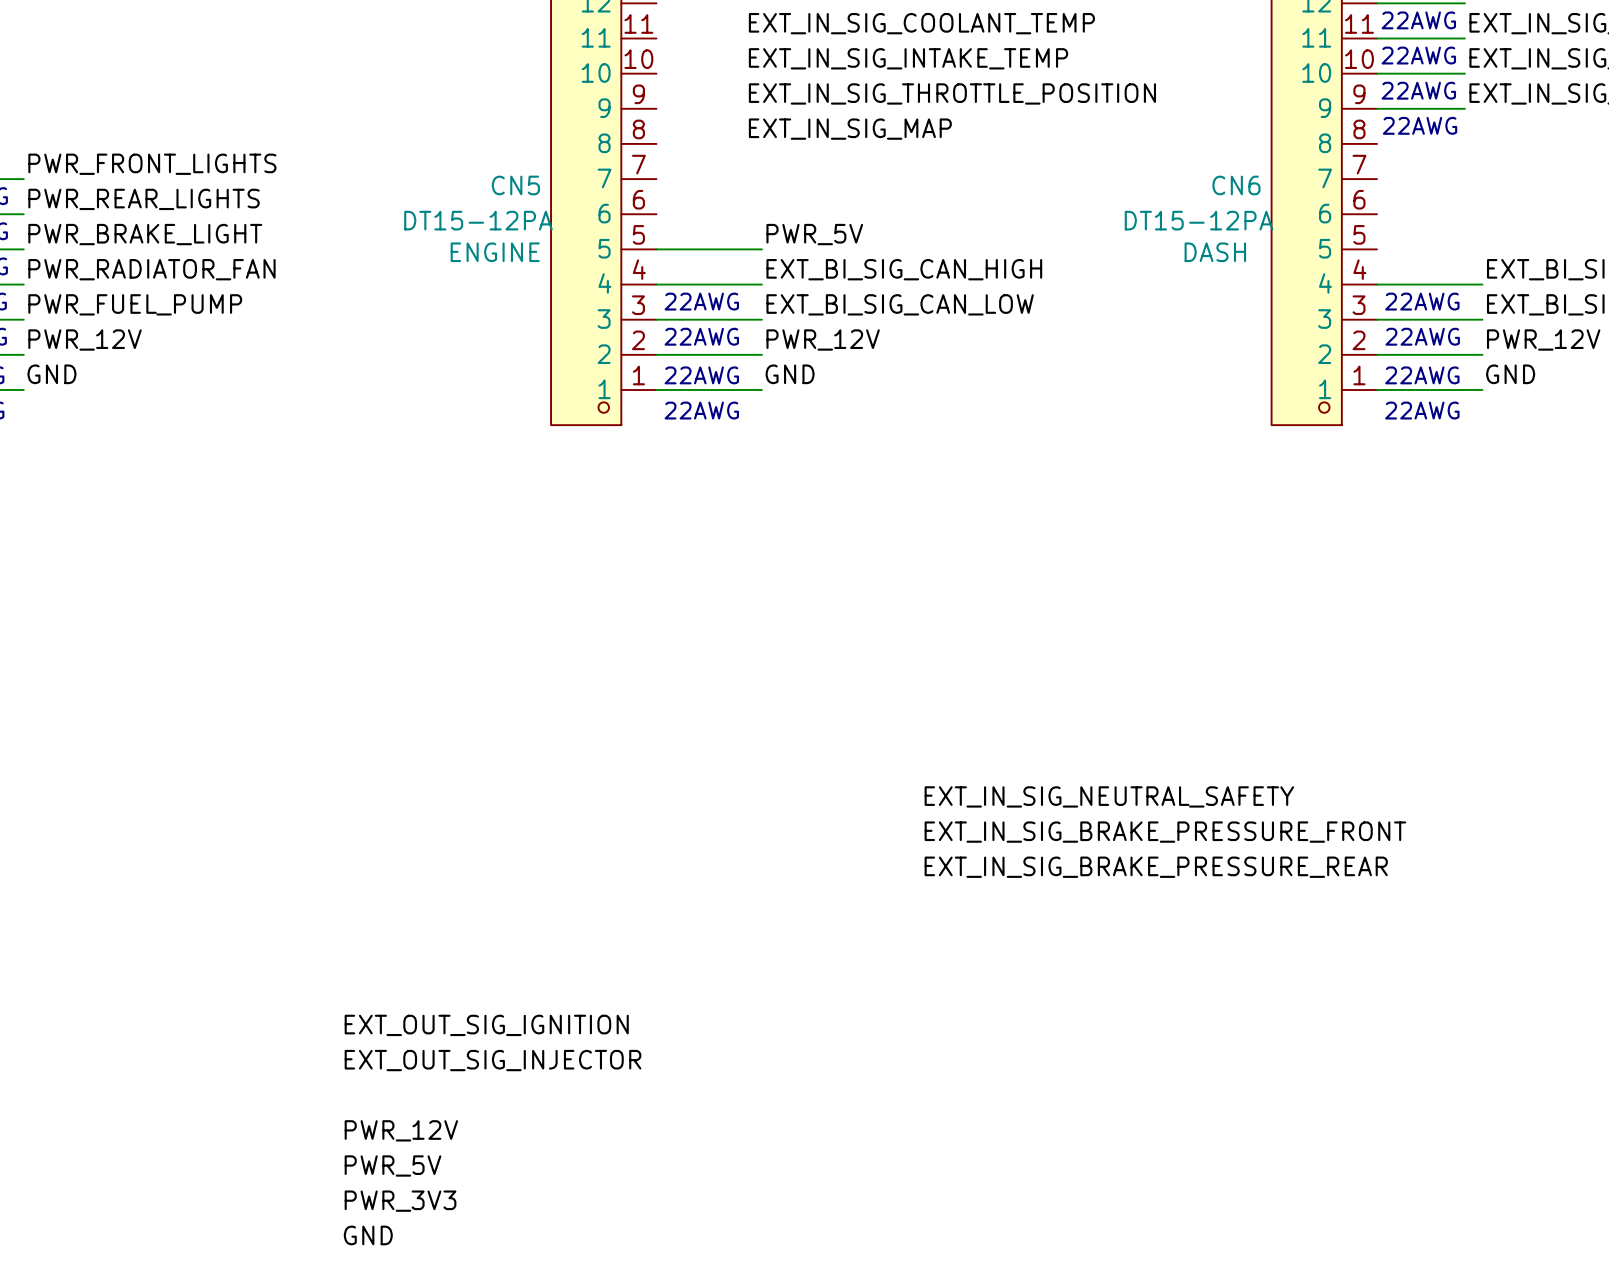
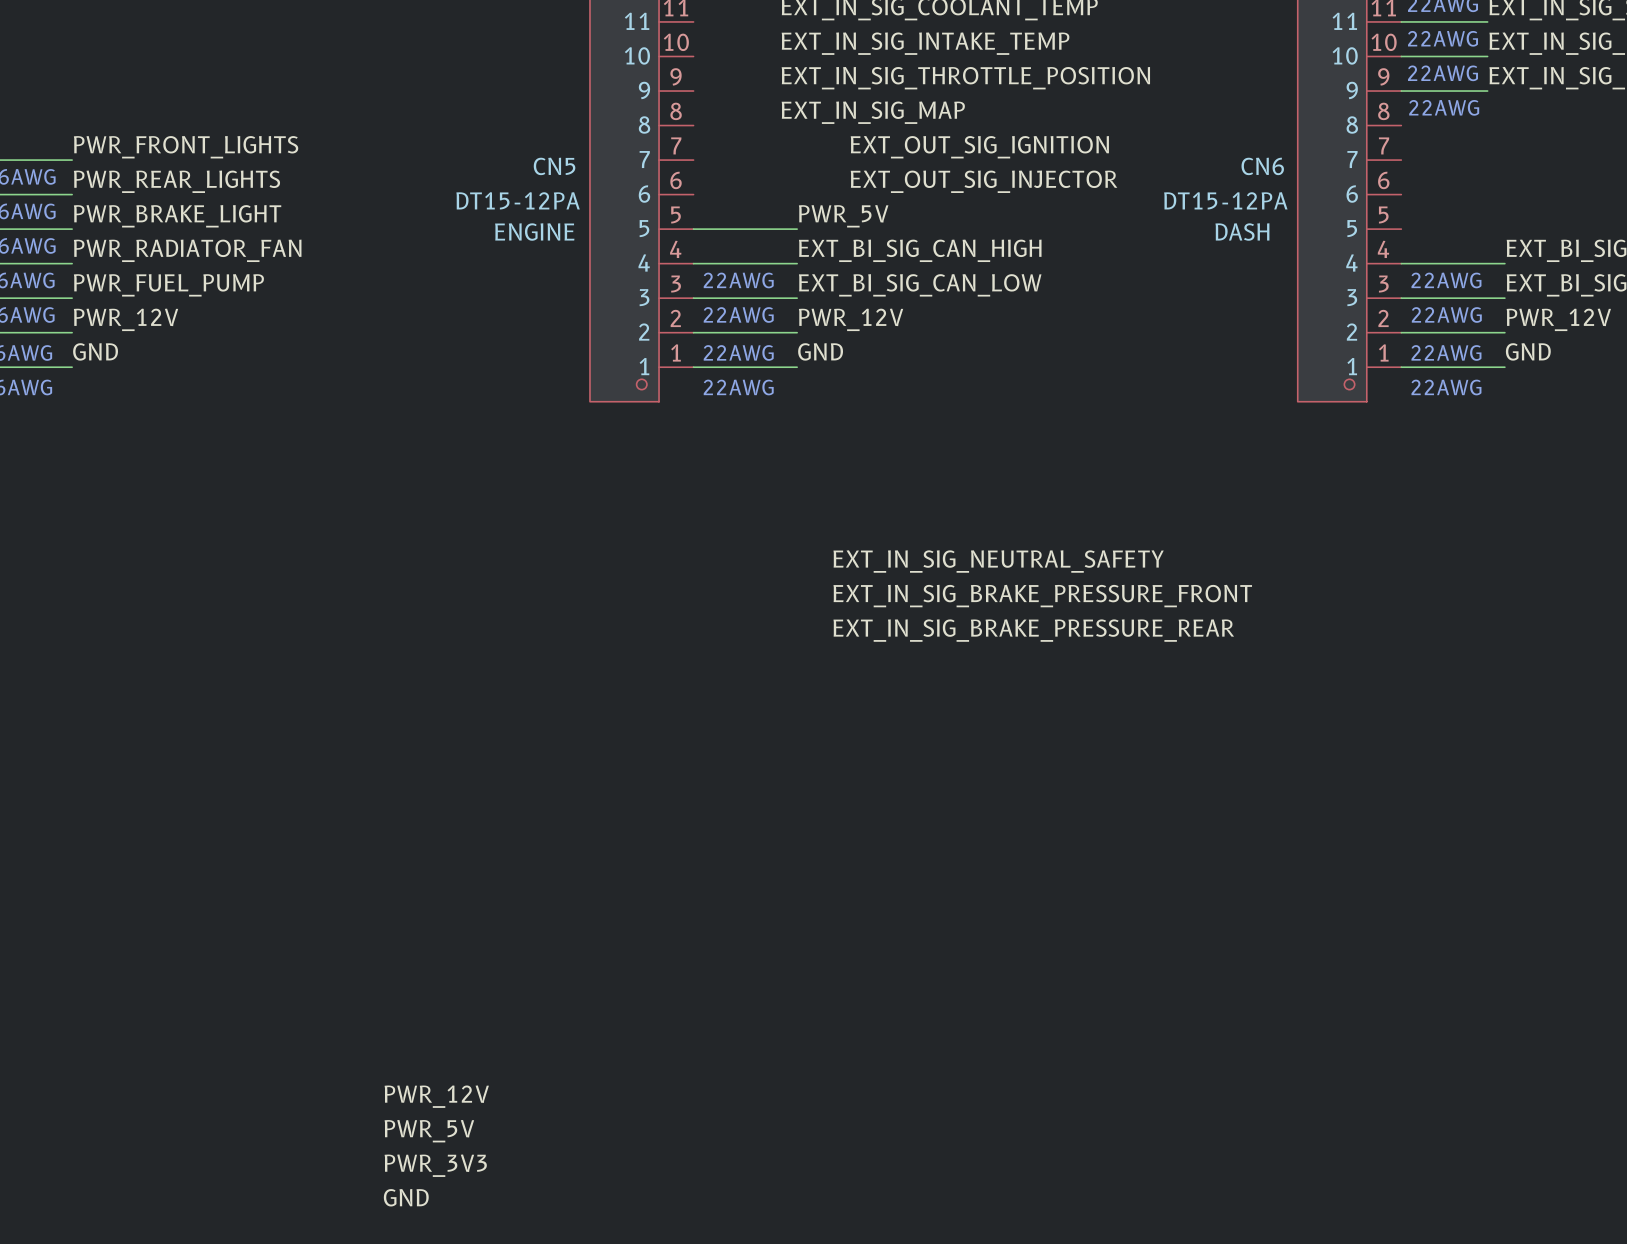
label: none -> EXT_OUT_SIG_IGNITION (979, 147)
label: none -> EXT_OUT_SIG_INJECTOR (984, 181)
label position: EXT_IN_SIG_NEUTRAL_SAFETY (1109, 796) -> EXT_IN_SIG_NEUTRAL_SAFETY (998, 561)
label position: EXT_IN_SIG_BRAKE_PRESSURE_FRONT (1165, 832) -> EXT_IN_SIG_BRAKE_PRESSURE_FRONT (1042, 596)
label position: EXT_IN_SIG_BRAKE_PRESSURE_REAR (1156, 867) -> EXT_IN_SIG_BRAKE_PRESSURE_REAR (1033, 630)
label: EXT_OUT_SIG_IGNITION (486, 1025) -> none
label: EXT_OUT_SIG_INJECTOR (492, 1060) -> none

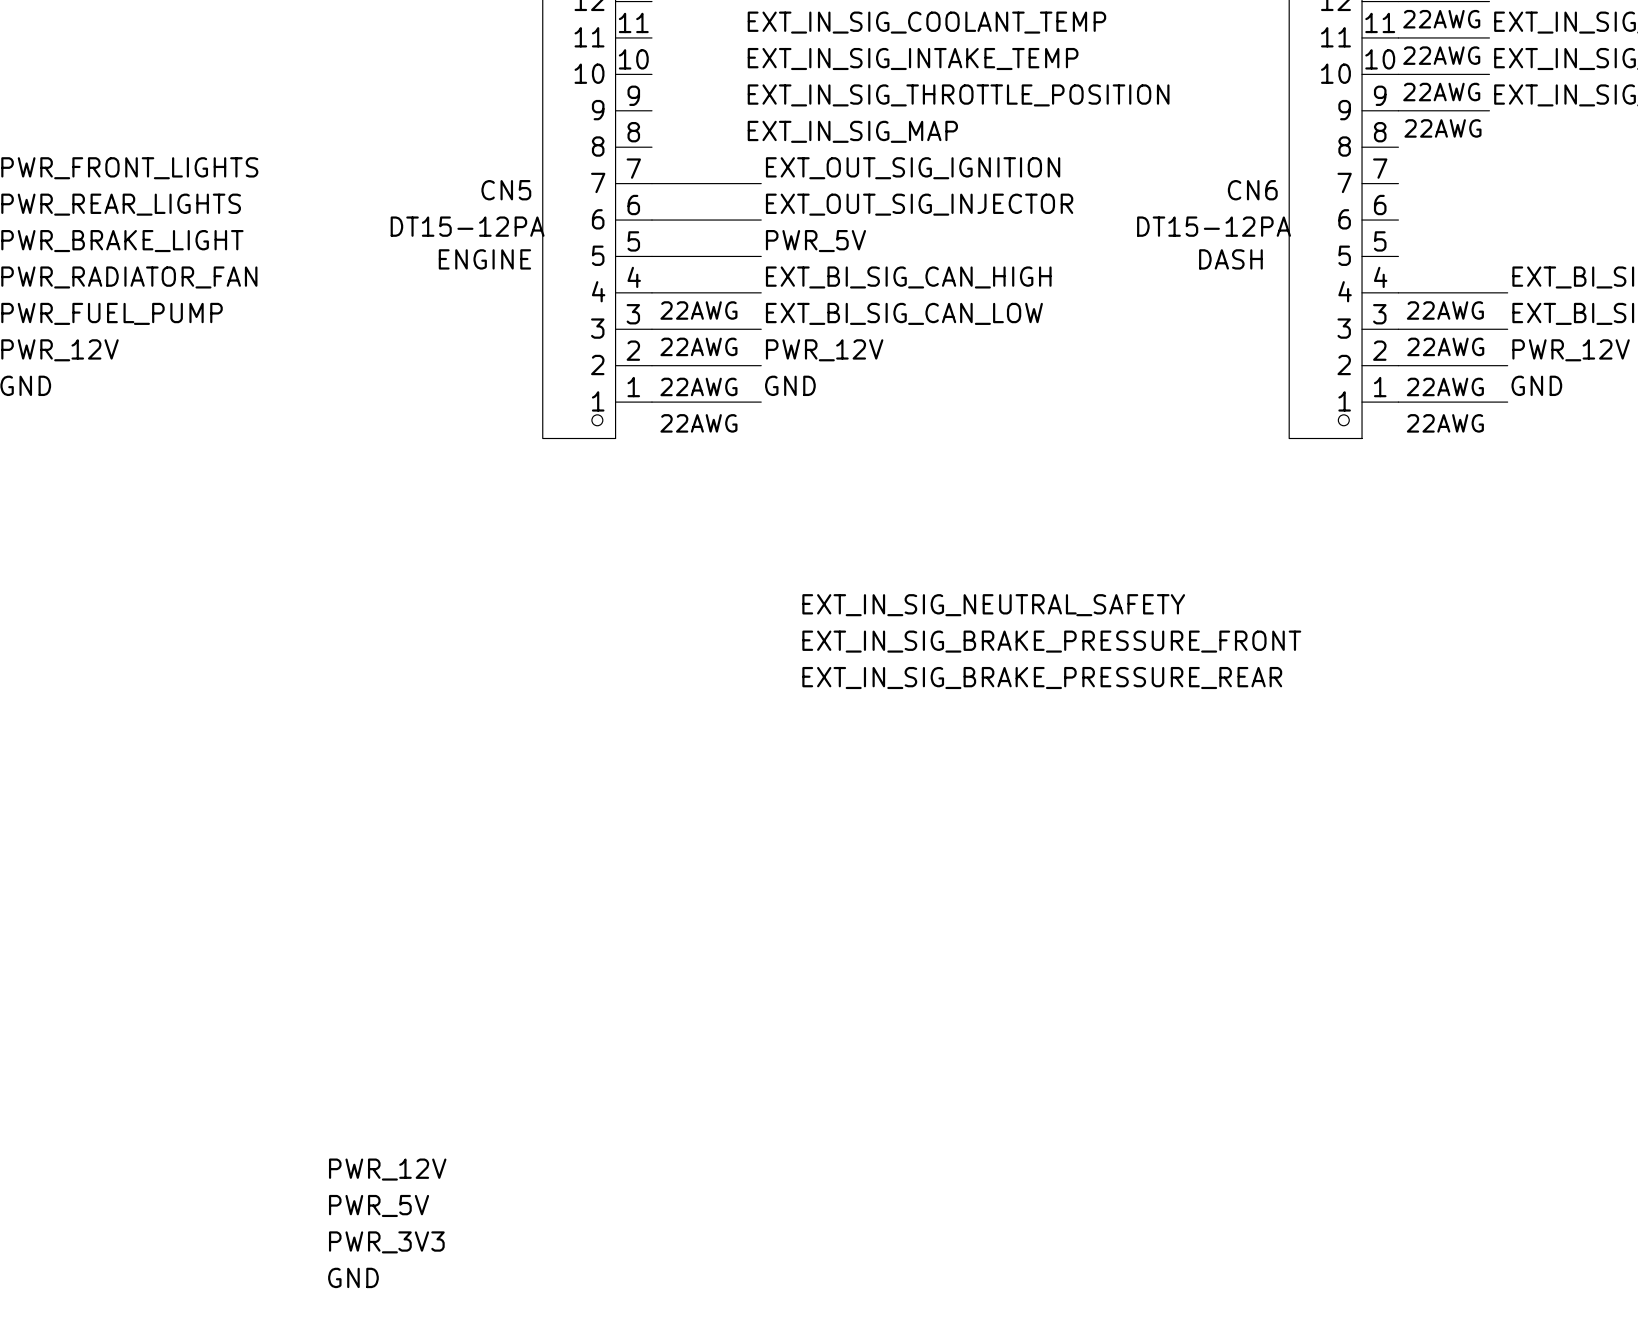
label position: EXT_OUT_SIG_IGNITION (979, 147) -> EXT_OUT_SIG_IGNITION (913, 168)
wire: none -> (651, 183) (761, 183)
label position: EXT_OUT_SIG_INJECTOR (984, 181) -> EXT_OUT_SIG_INJECTOR (919, 204)
wire: none -> (651, 220) (761, 220)

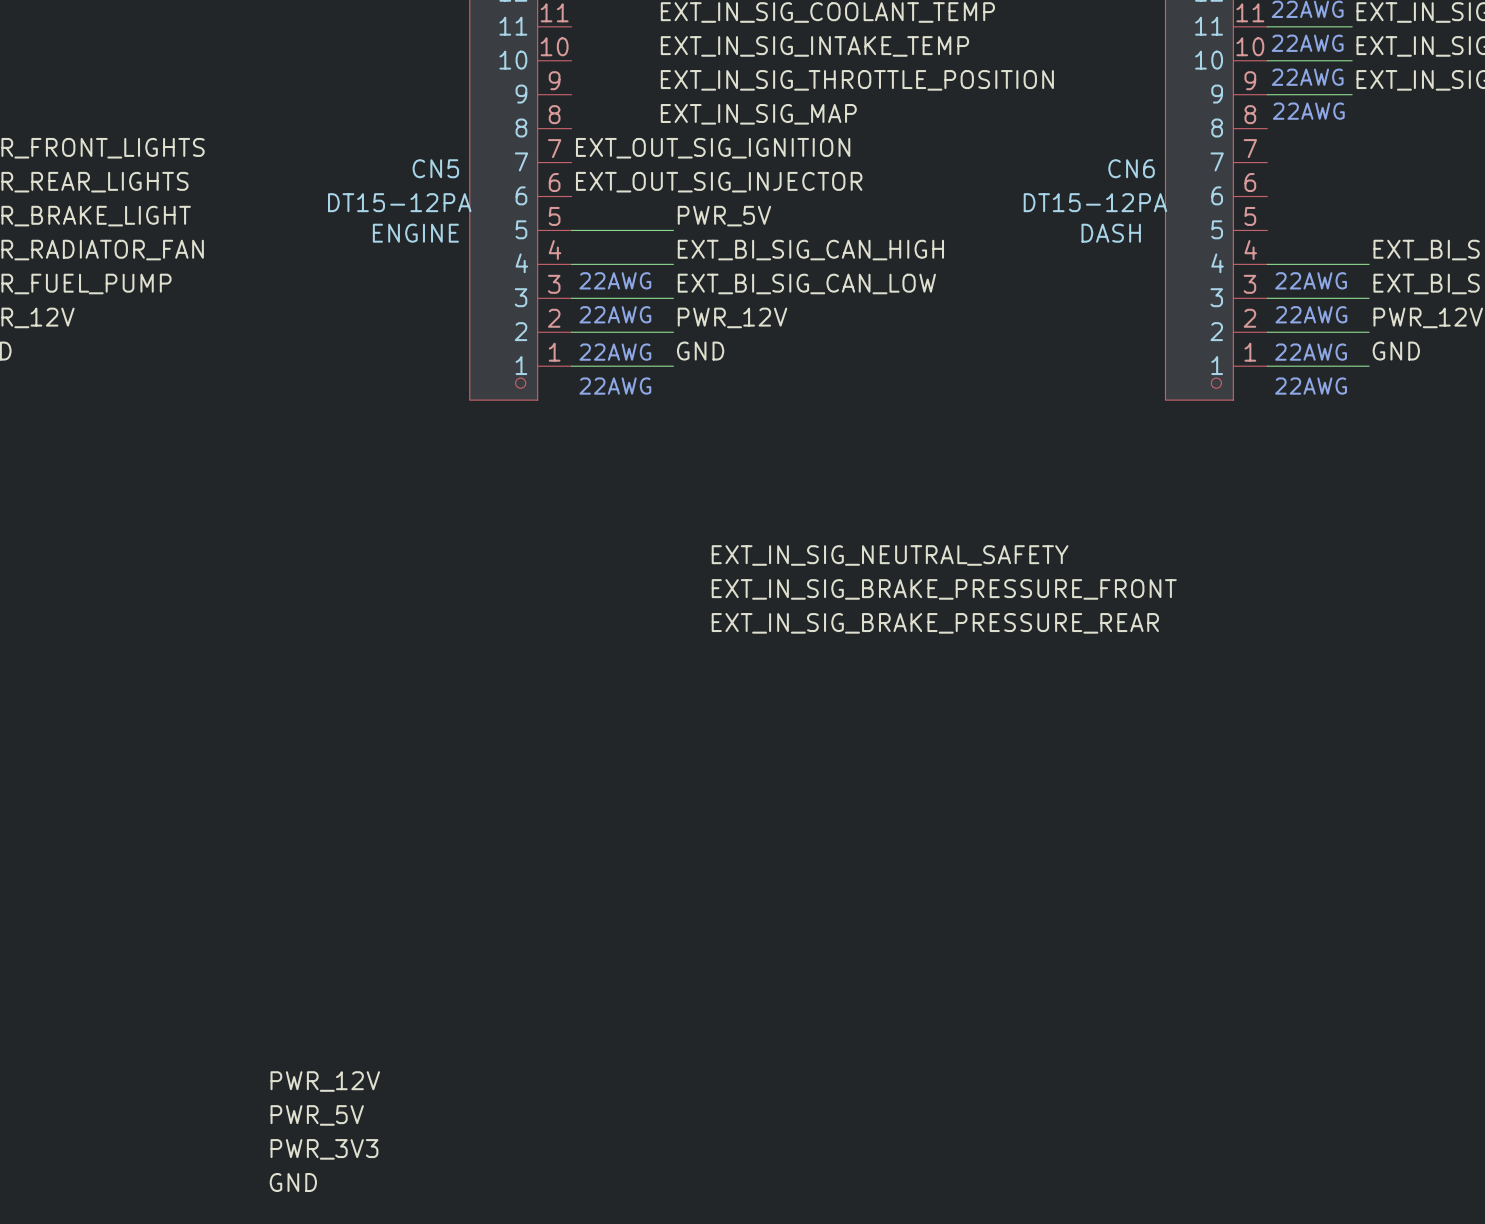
label position: EXT_OUT_SIG_IGNITION (913, 168) -> EXT_OUT_SIG_IGNITION (713, 148)
wire: (651, 183) (761, 183) -> none
label position: EXT_OUT_SIG_INJECTOR (919, 204) -> EXT_OUT_SIG_INJECTOR (719, 182)
wire: (651, 220) (761, 220) -> none

